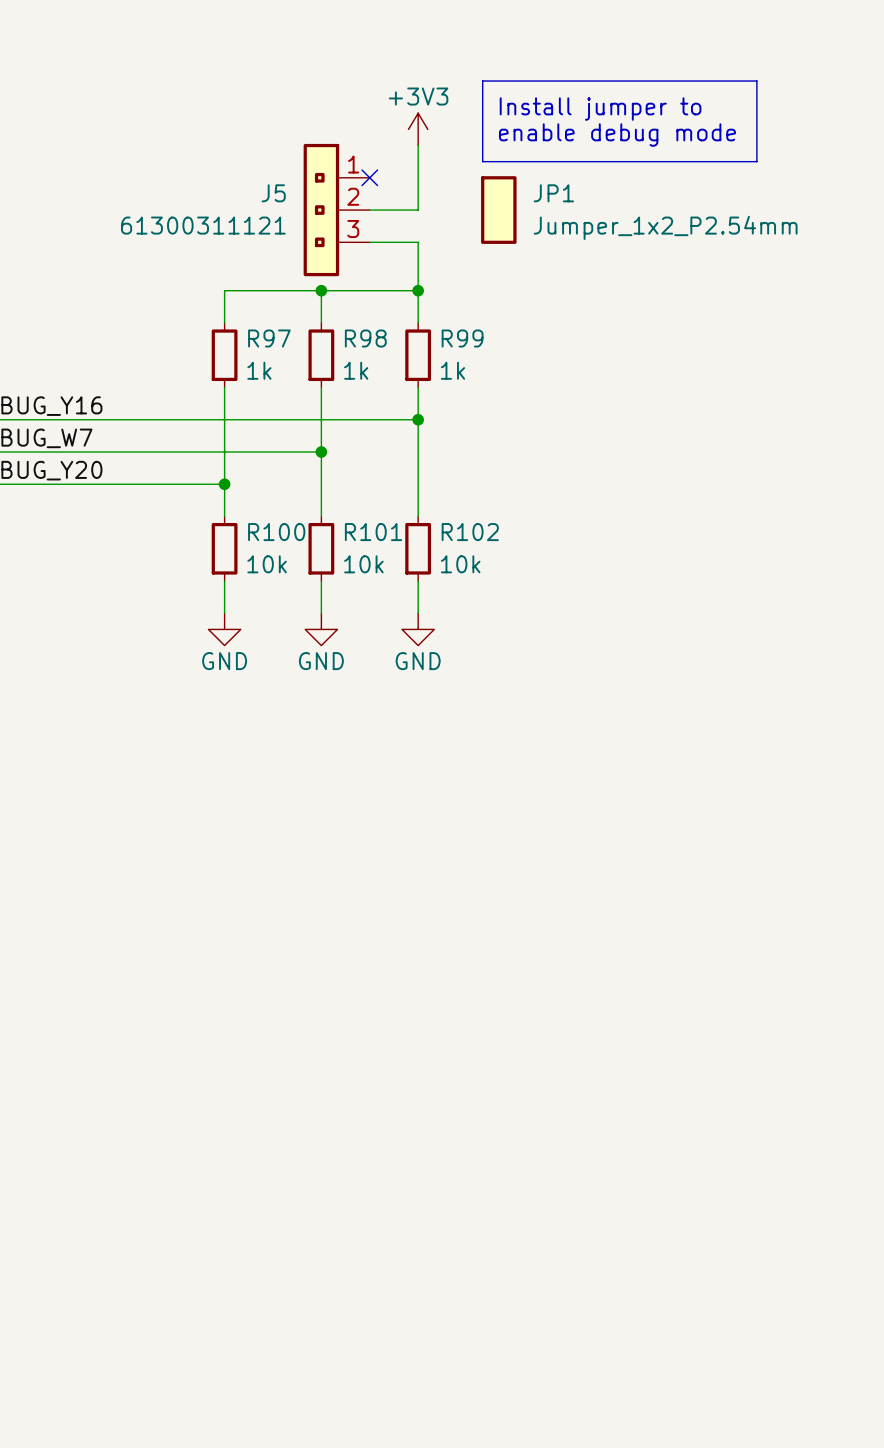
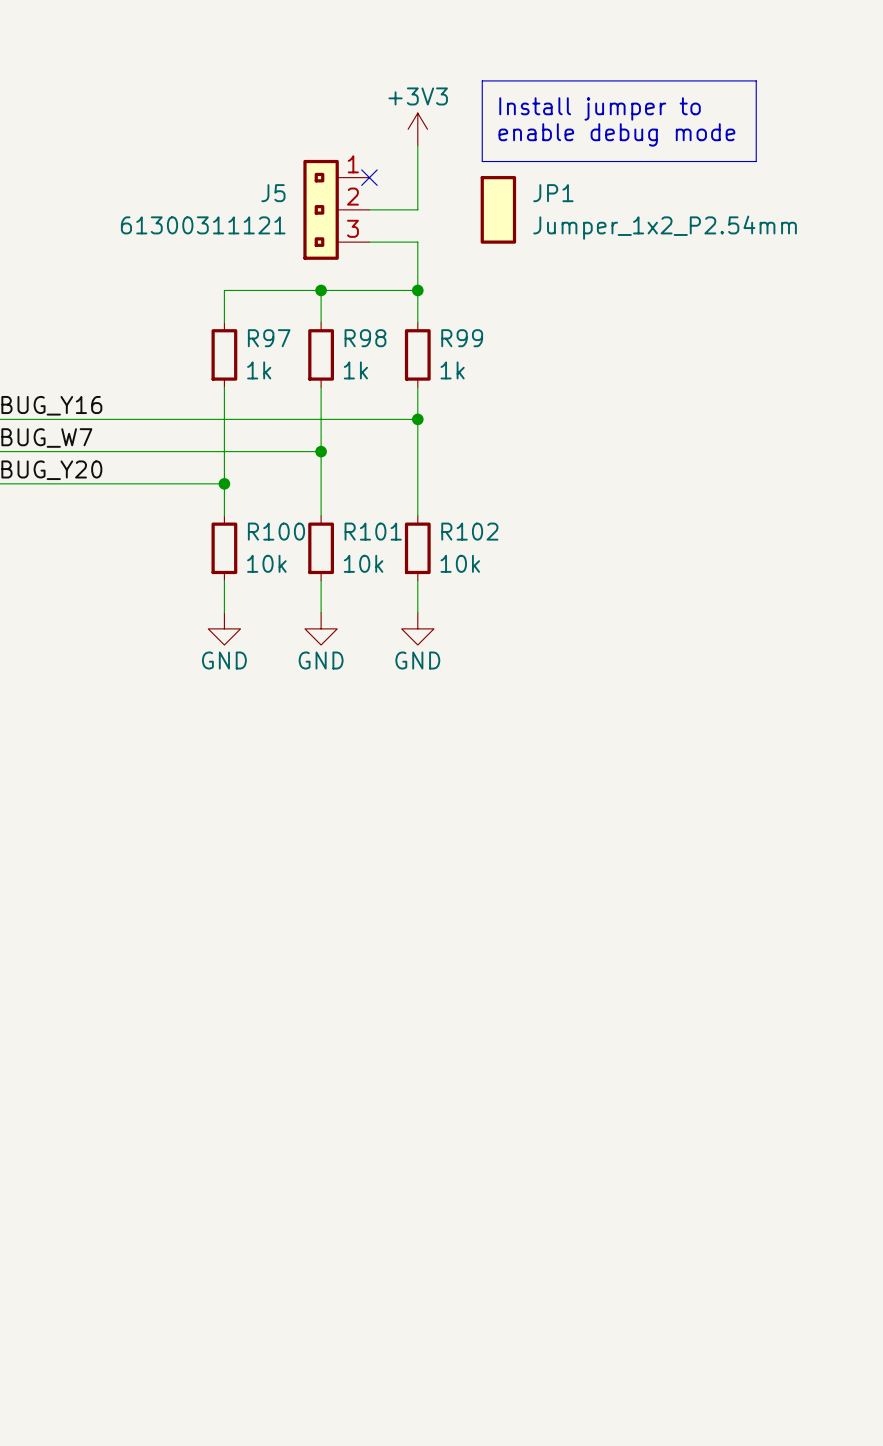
J5 symbol: [303, 143, 370, 277] -> [303, 159, 370, 260]

